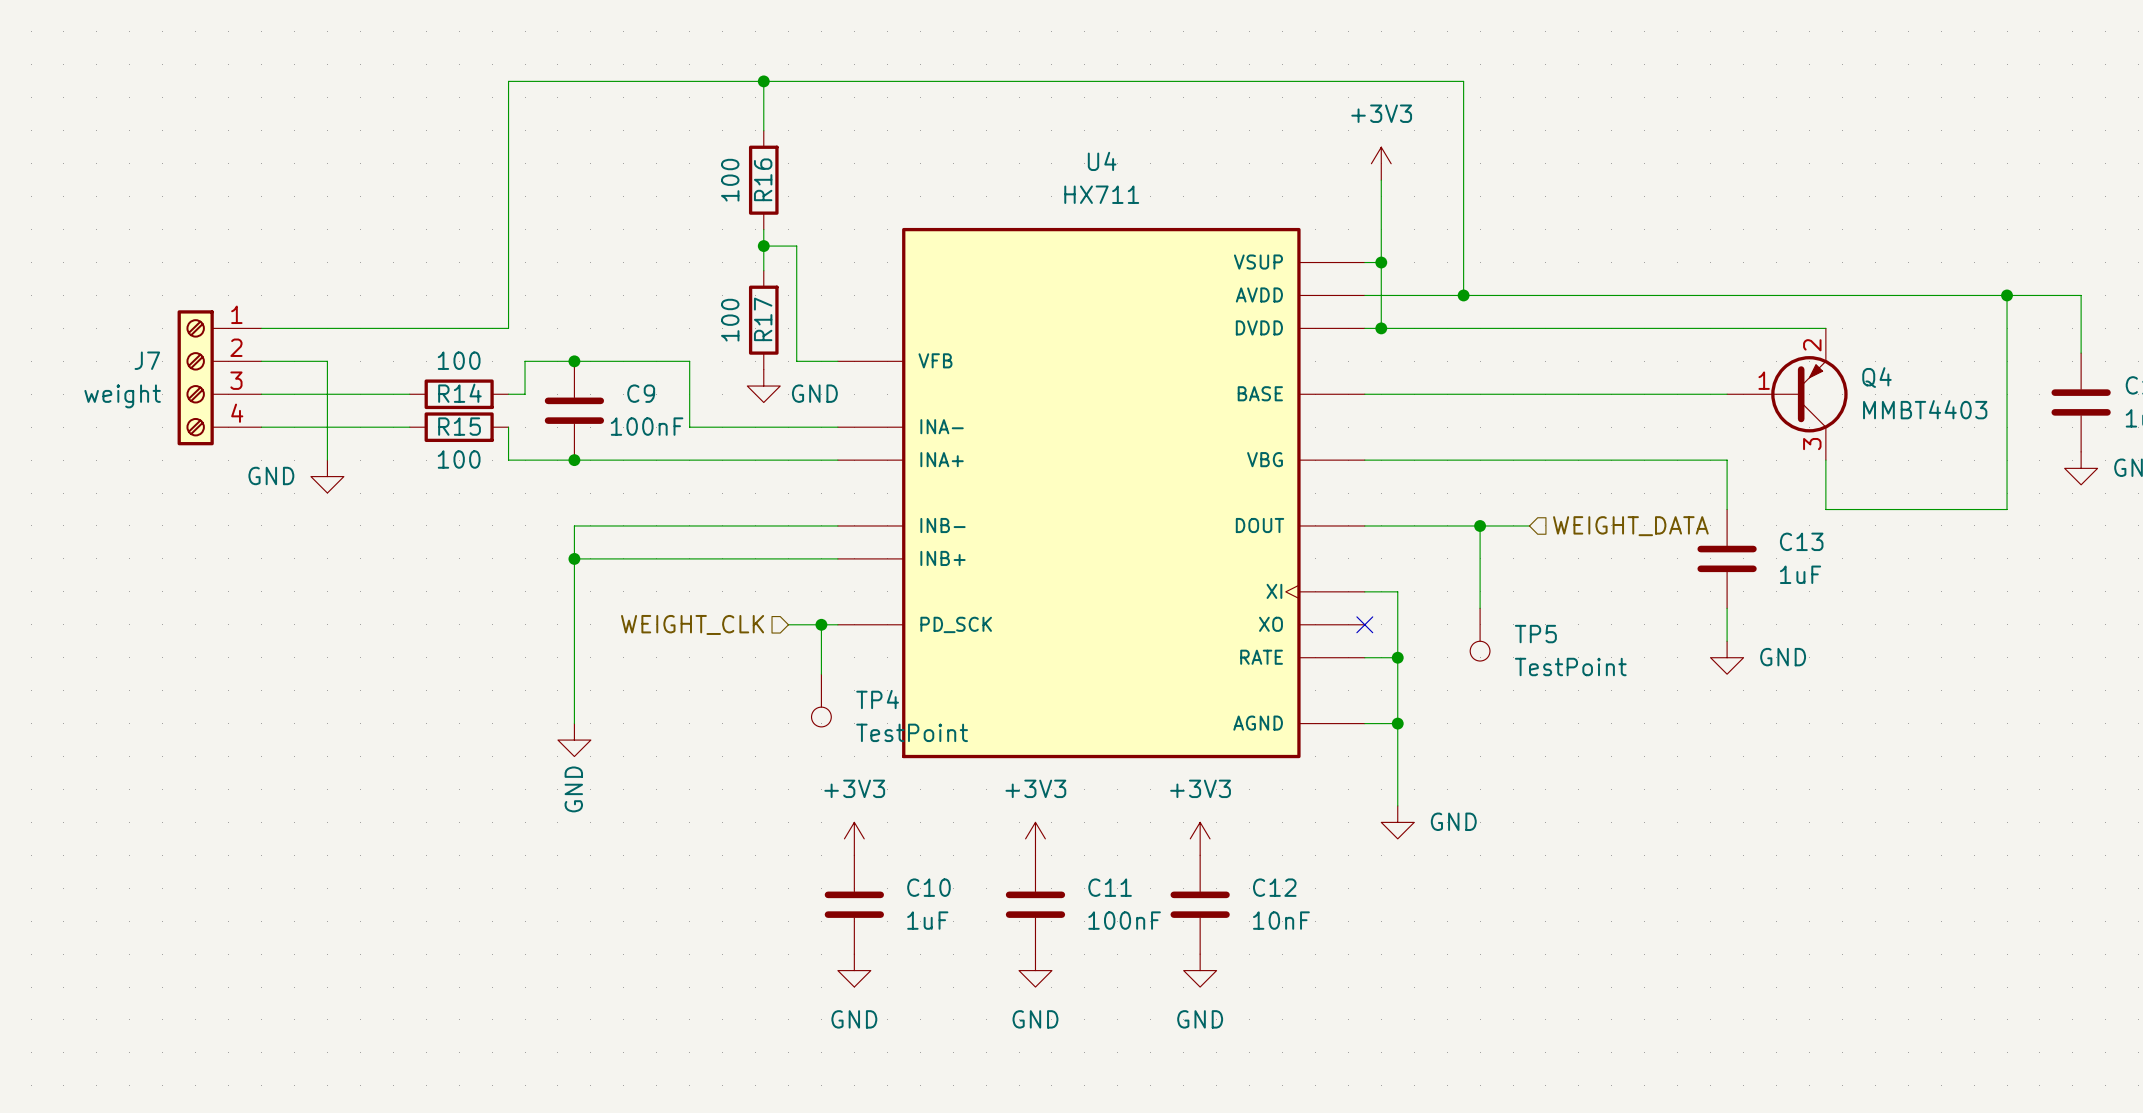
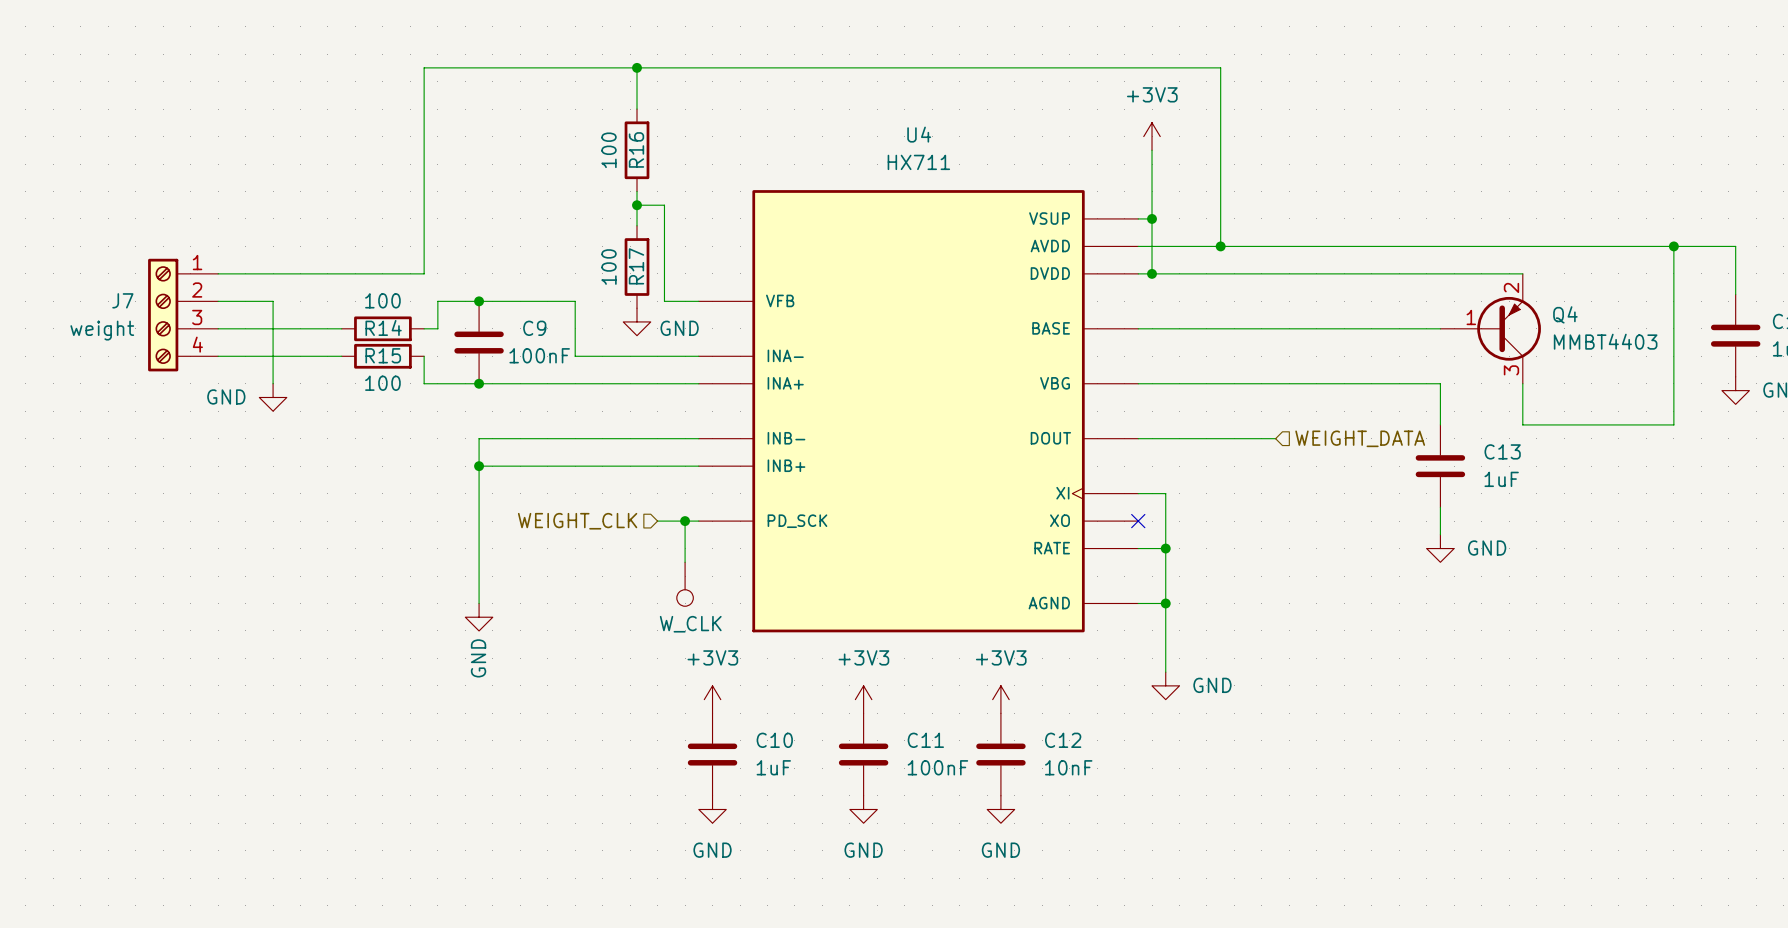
wire: (1480, 525) (1480, 608) -> none
junction: (1480, 525) -> none
TP5: TestPoint (1480, 634) -> none
TP4 name: TP4 (877, 699) -> none
TP4 value: TestPoint (912, 732) -> W_CLK (690, 624)

